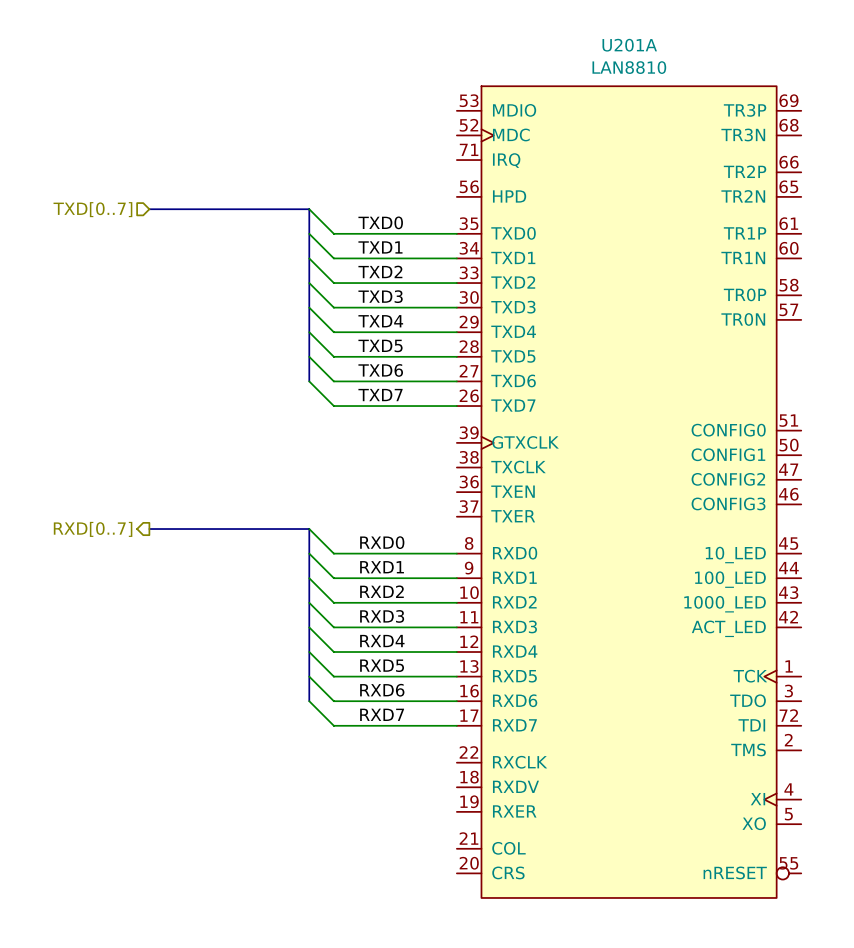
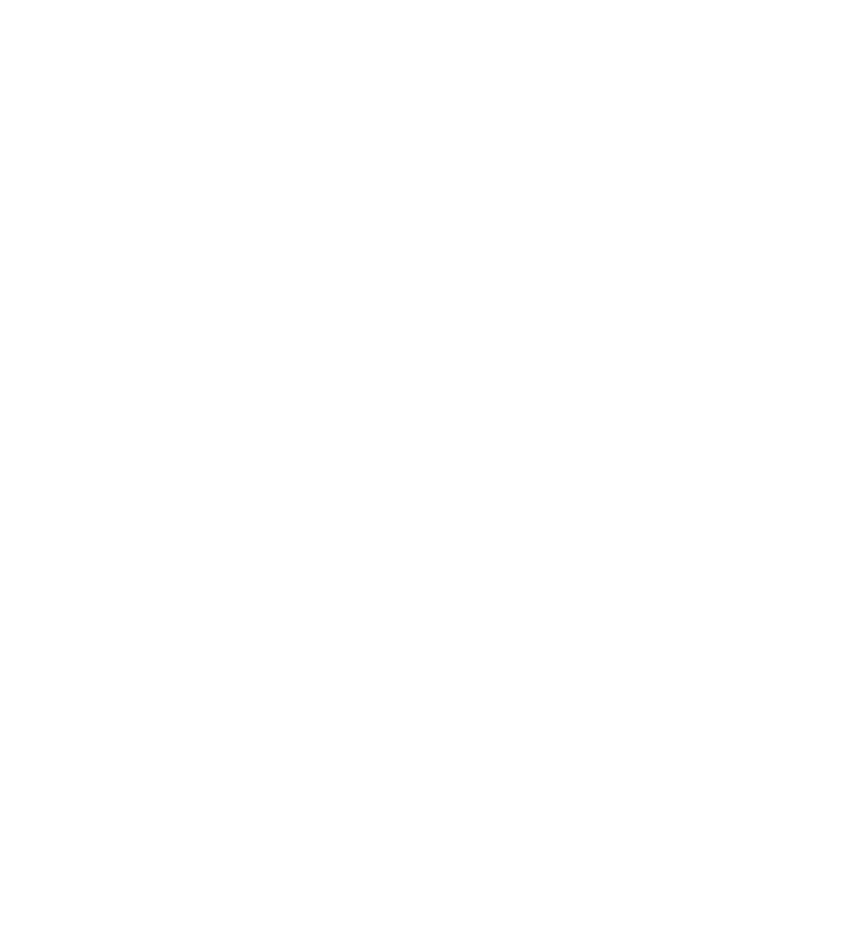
hierarchical label: TXD[0..7] (92, 209) -> none
bus: (149, 209) (309, 209) (309, 381) -> none
wire: (309, 209) (333, 233) (456, 233) -> none
label: TXD0 (380, 222) -> none
wire: (309, 233) (333, 258) (456, 258) -> none
label: TXD1 (380, 247) -> none
wire: (309, 258) (333, 283) (456, 283) -> none
label: TXD2 (380, 271) -> none
wire: (309, 283) (333, 307) (456, 307) -> none
label: TXD3 (380, 296) -> none
wire: (309, 307) (333, 332) (456, 332) -> none
label: TXD4 (380, 321) -> none
wire: (309, 332) (333, 356) (456, 356) -> none
label: TXD5 (380, 345) -> none
wire: (309, 356) (333, 381) (456, 381) -> none
label: TXD6 (380, 370) -> none
wire: (309, 381) (333, 406) (456, 406) -> none
label: TXD7 (380, 395) -> none
U201A: LAN8810 (629, 492) -> none
hierarchical label: RXD[0..7] (93, 529) -> none
bus: (149, 529) (309, 529) (309, 701) -> none
wire: (309, 529) (333, 553) (456, 553) -> none
label: RXD0 (382, 542) -> none
wire: (309, 553) (333, 578) (456, 578) -> none
label: RXD1 (382, 567) -> none
wire: (309, 578) (333, 602) (456, 602) -> none
label: RXD2 (381, 591) -> none
wire: (309, 602) (333, 627) (456, 627) -> none
label: RXD3 (382, 616) -> none
wire: (309, 627) (333, 652) (456, 652) -> none
label: RXD4 (382, 641) -> none
wire: (309, 652) (333, 676) (456, 676) -> none
label: RXD5 (382, 665) -> none
wire: (309, 676) (333, 701) (456, 701) -> none
label: RXD6 (382, 690) -> none
wire: (309, 701) (333, 725) (456, 725) -> none
label: RXD7 (382, 714) -> none

